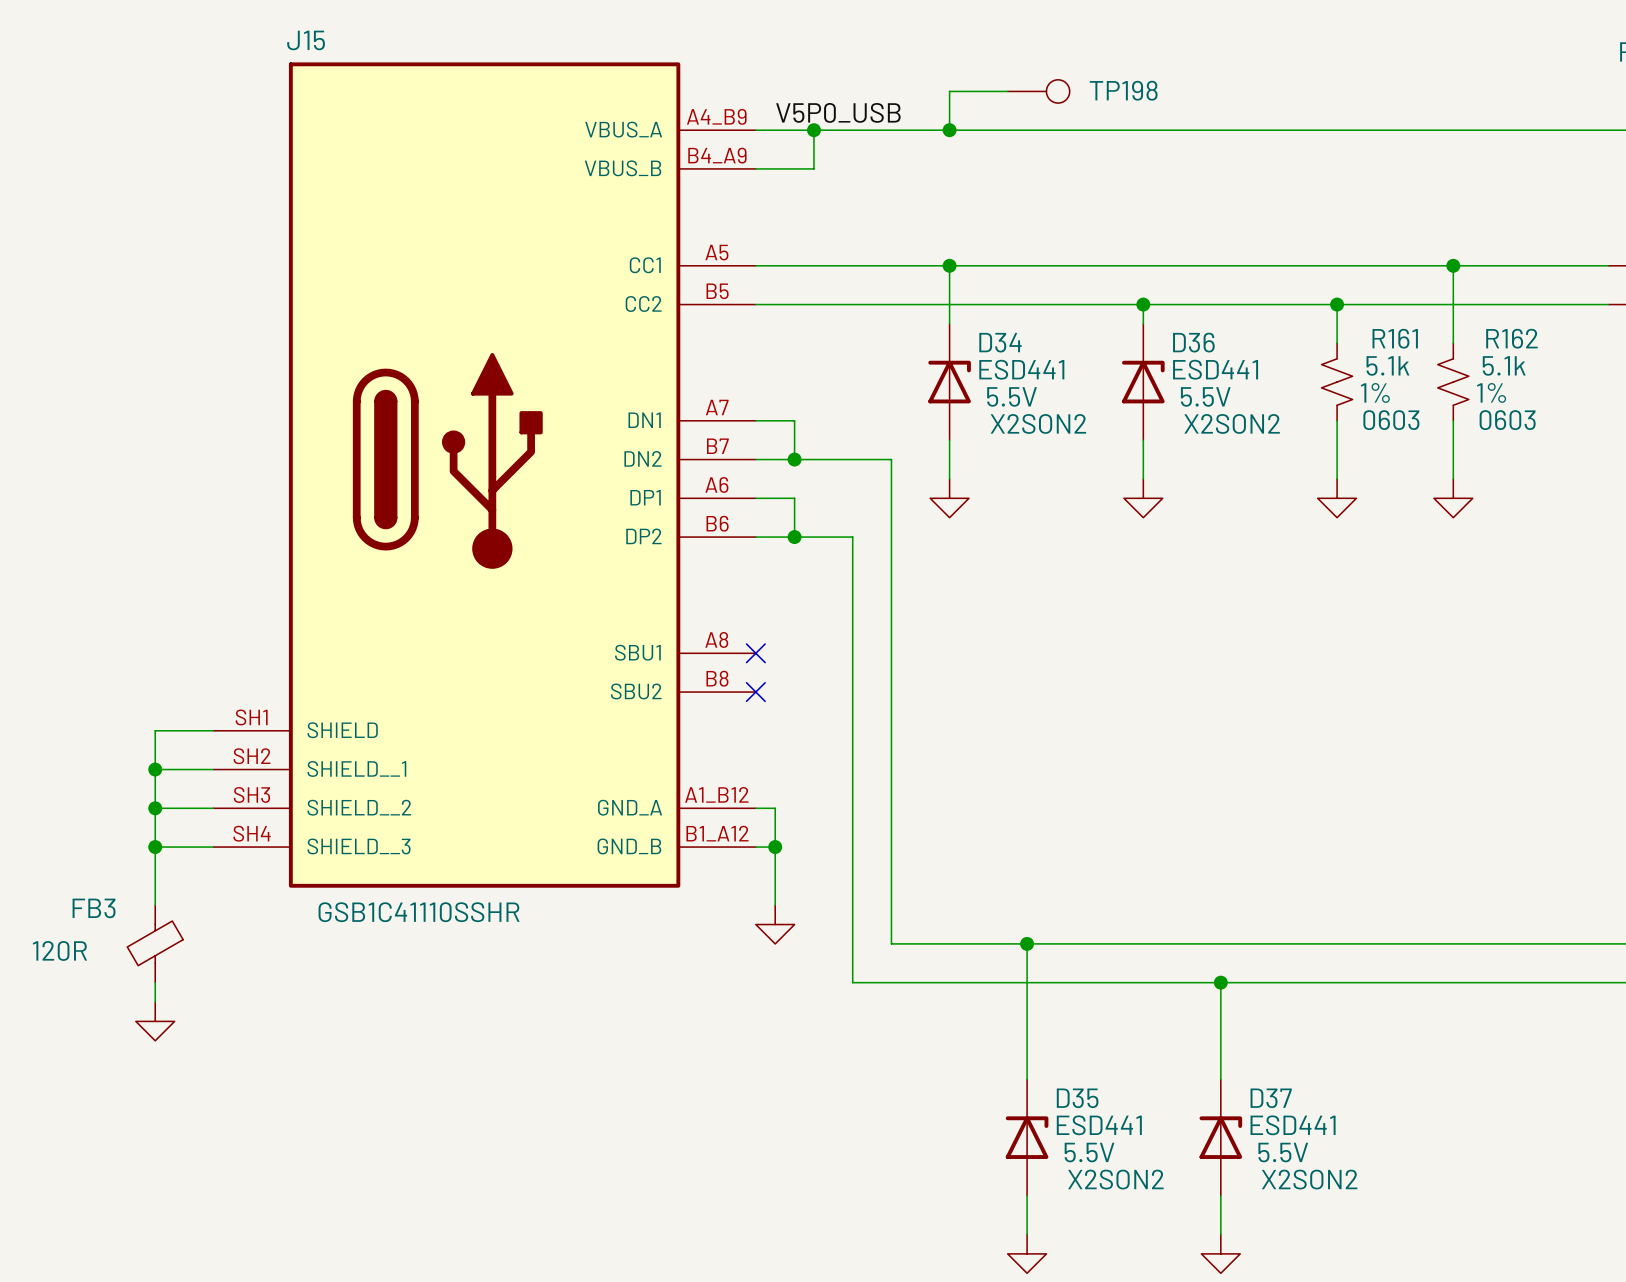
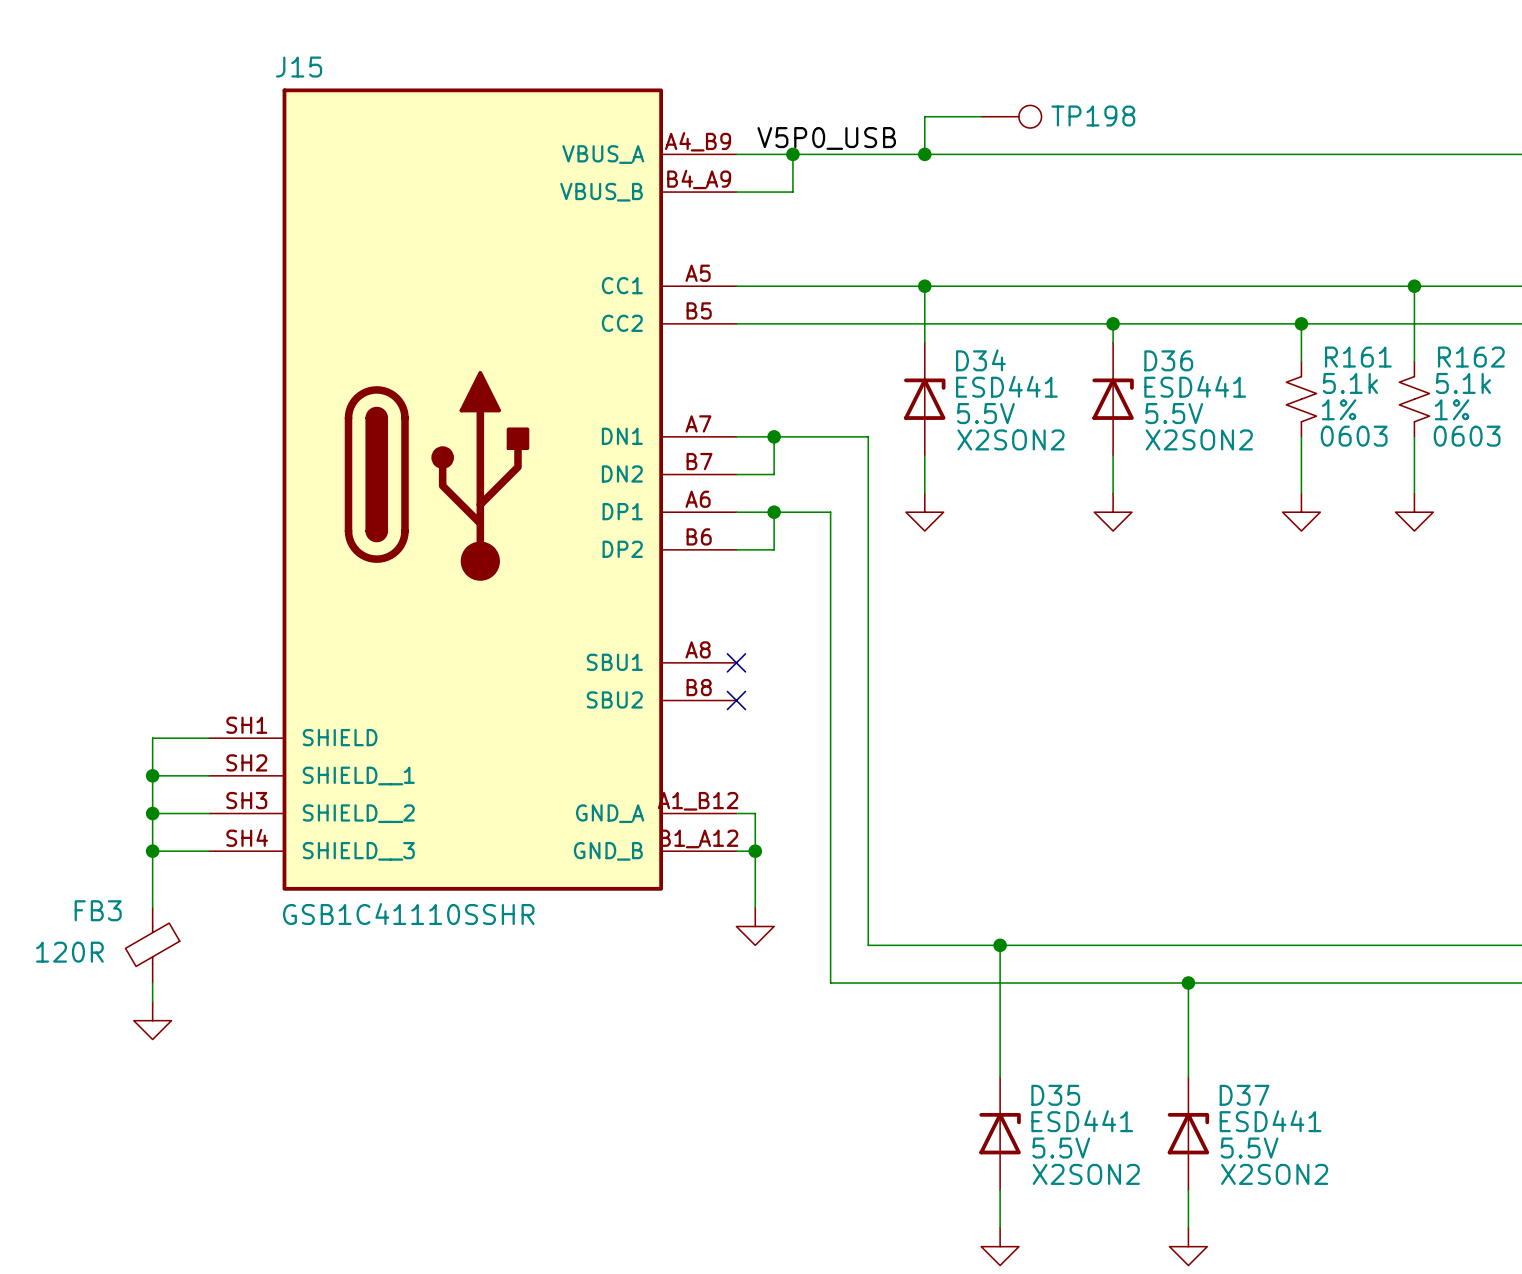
junction: none -> (774, 436)
wire: (794, 459) (891, 459) -> (774, 436) (868, 436) (868, 474)
junction: (794, 459) -> none
junction: none -> (774, 512)
wire: (794, 537) (852, 537) -> (774, 512) (830, 512) (830, 549)
junction: (794, 537) -> none

